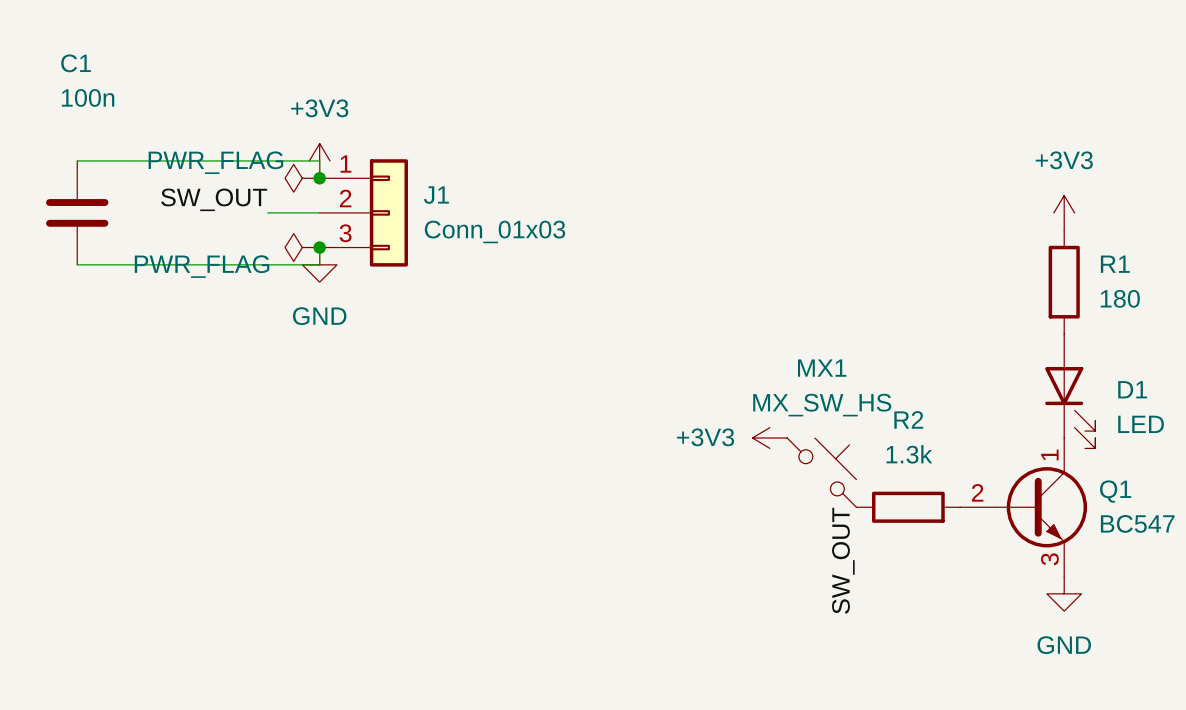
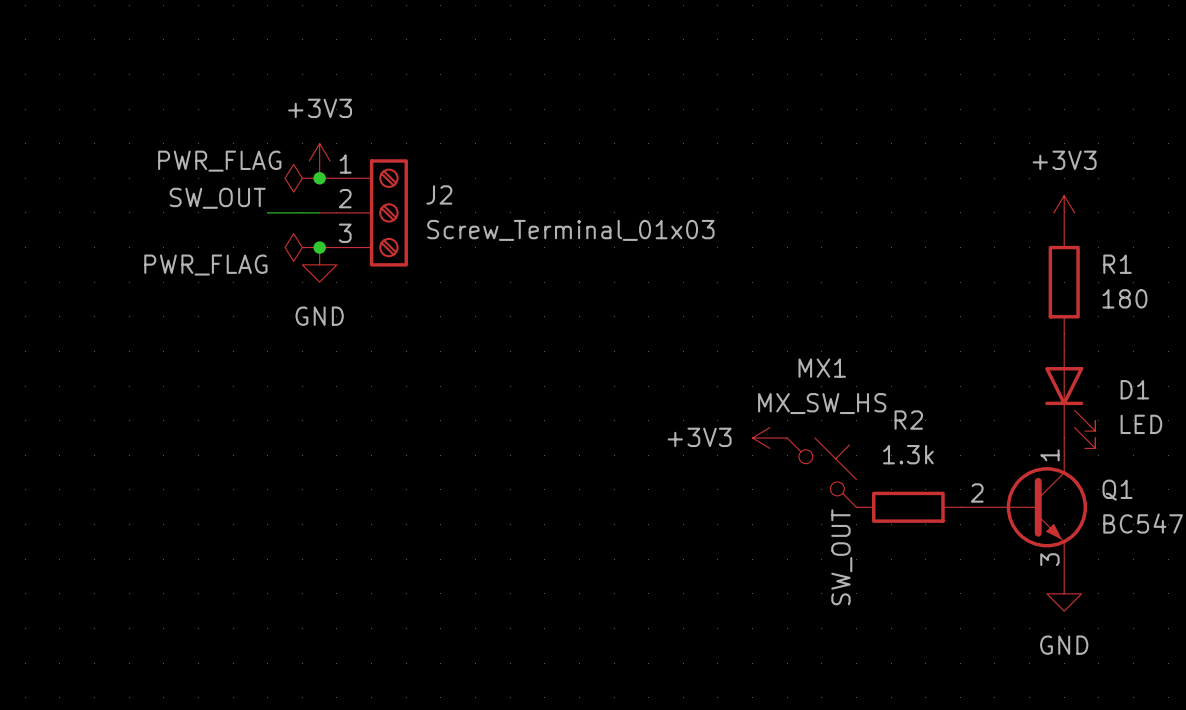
wire: (77, 160) (319, 160) (319, 178) -> none
C1: 100n (77, 212) -> none
J1: Conn_01x03 (363, 212) -> none
J2: none -> Screw_Terminal_01x03 (363, 212)
wire: (319, 247) (319, 264) (77, 264) -> none

